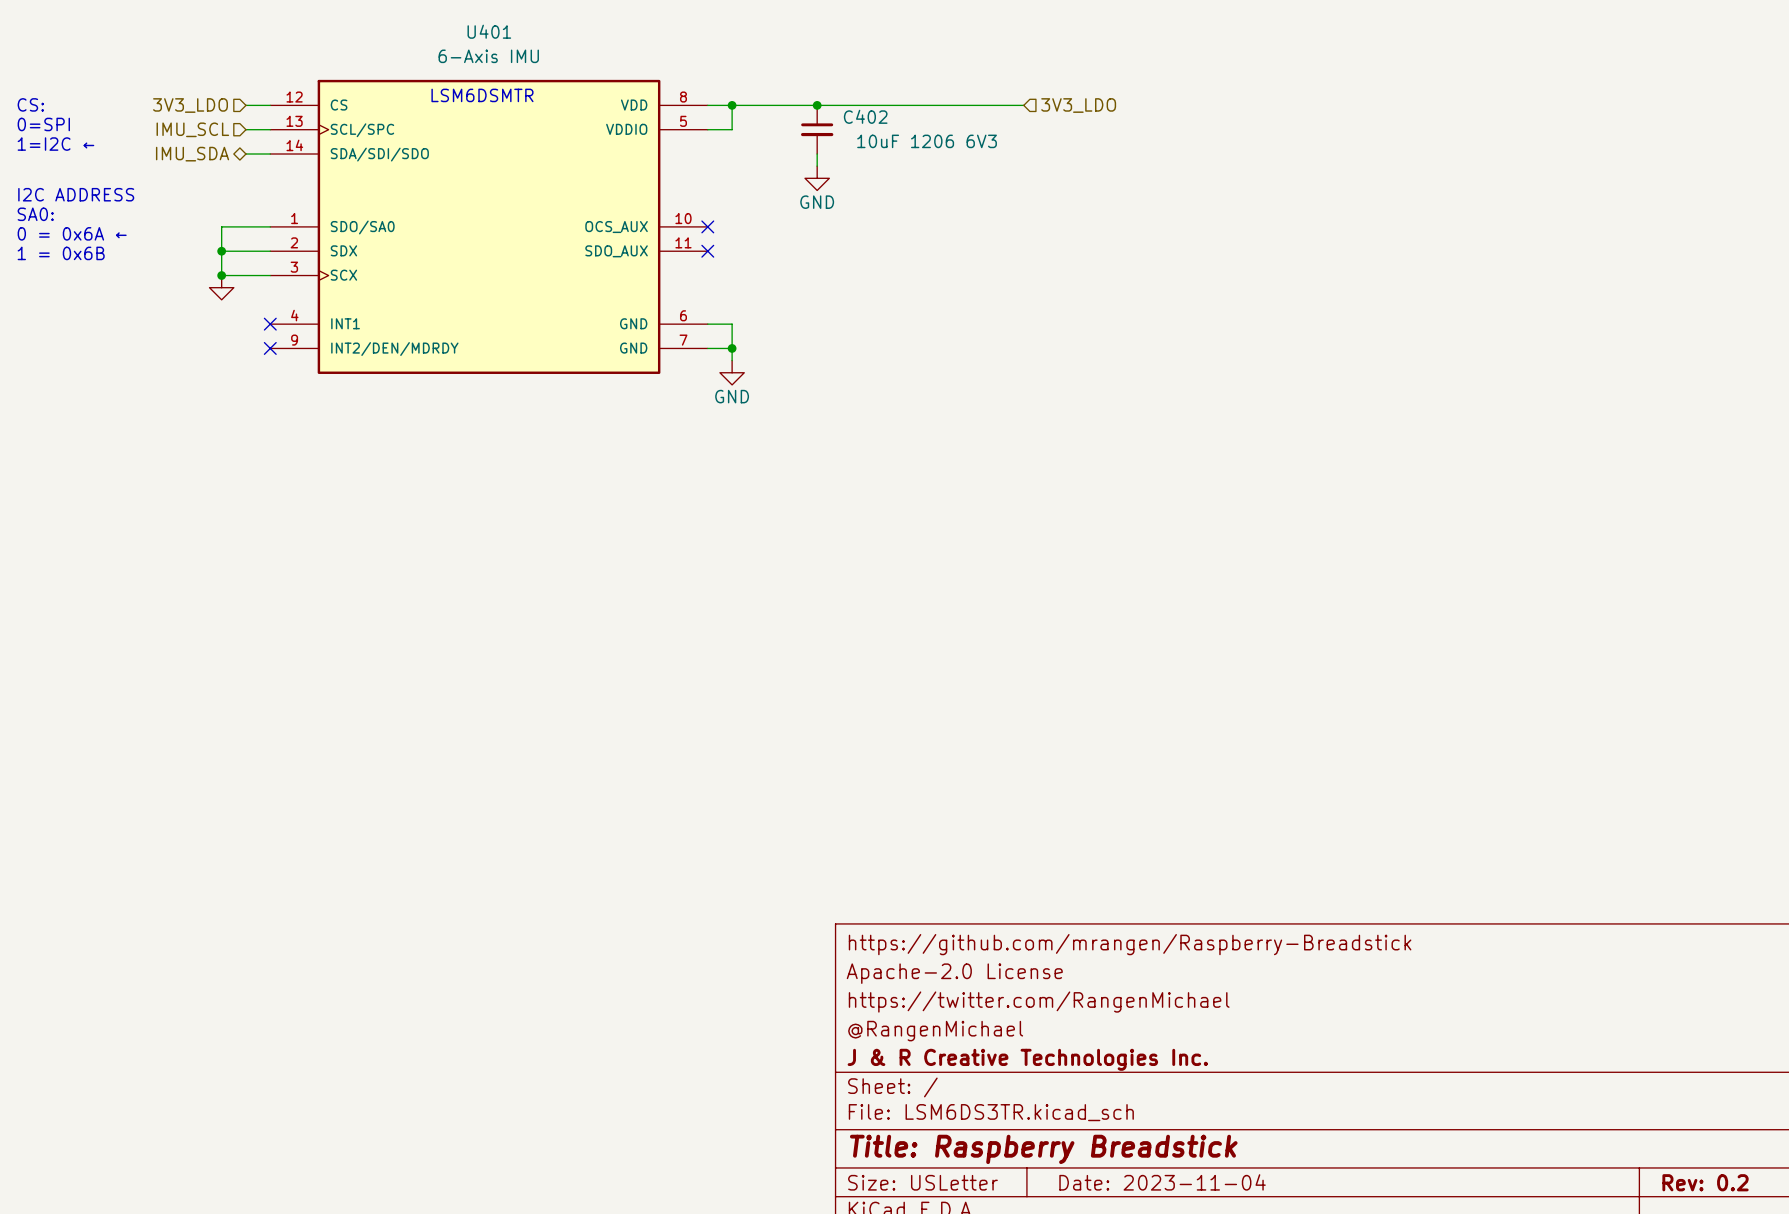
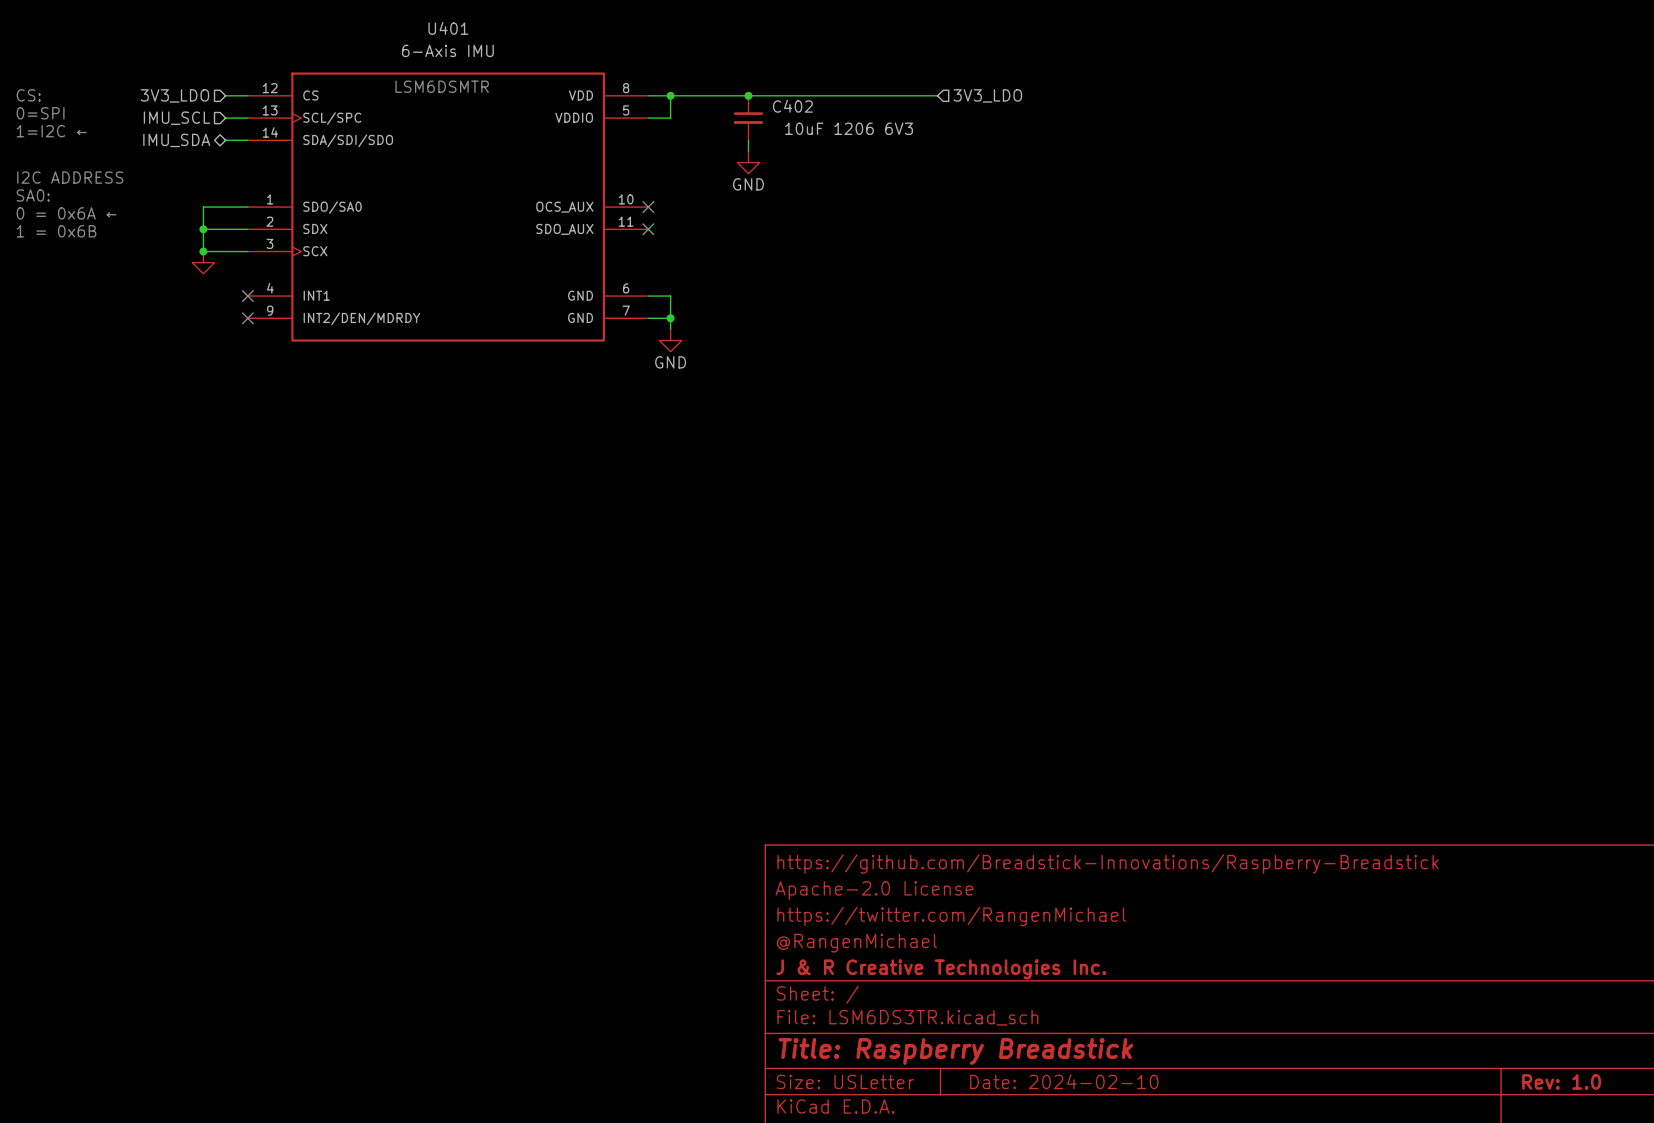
title block: https://github.com/mrangen/Raspberry-Breadstick (1130, 944) -> https://github.com/Breadstick-Innovations/Raspberry-Breadstick (1108, 863)
title block: Date: 2023-11-04 (1162, 1182) -> Date: 2024-02-10 (1064, 1081)
title block: Rev: 0.2 (1705, 1182) -> Rev: 1.0 (1561, 1081)

